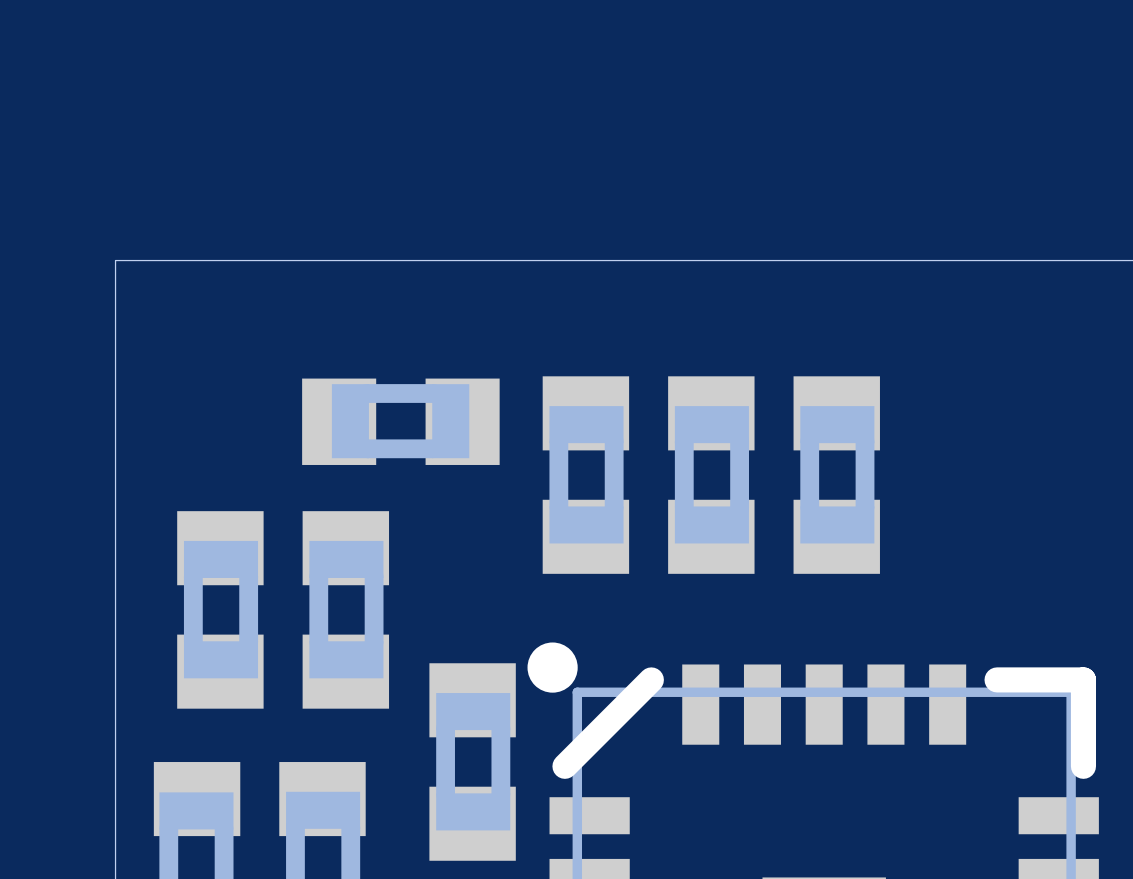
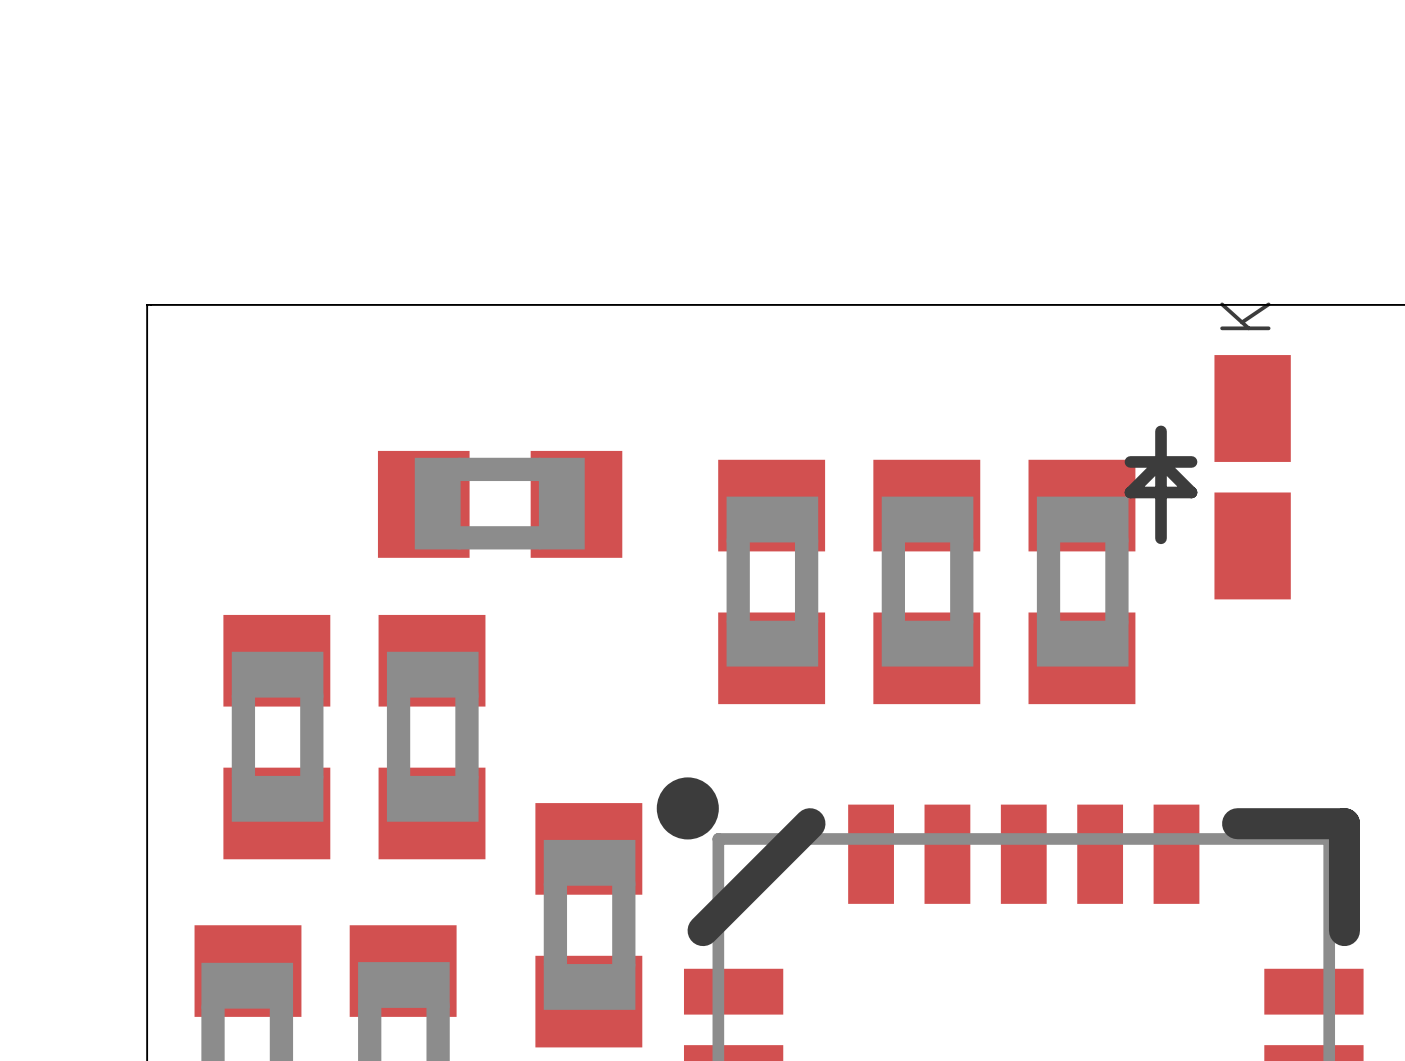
part: none -> (1207, 477)
part position: (585, 475) -> (771, 581)
part position: (711, 475) -> (926, 581)
part position: (836, 475) -> (1081, 581)

